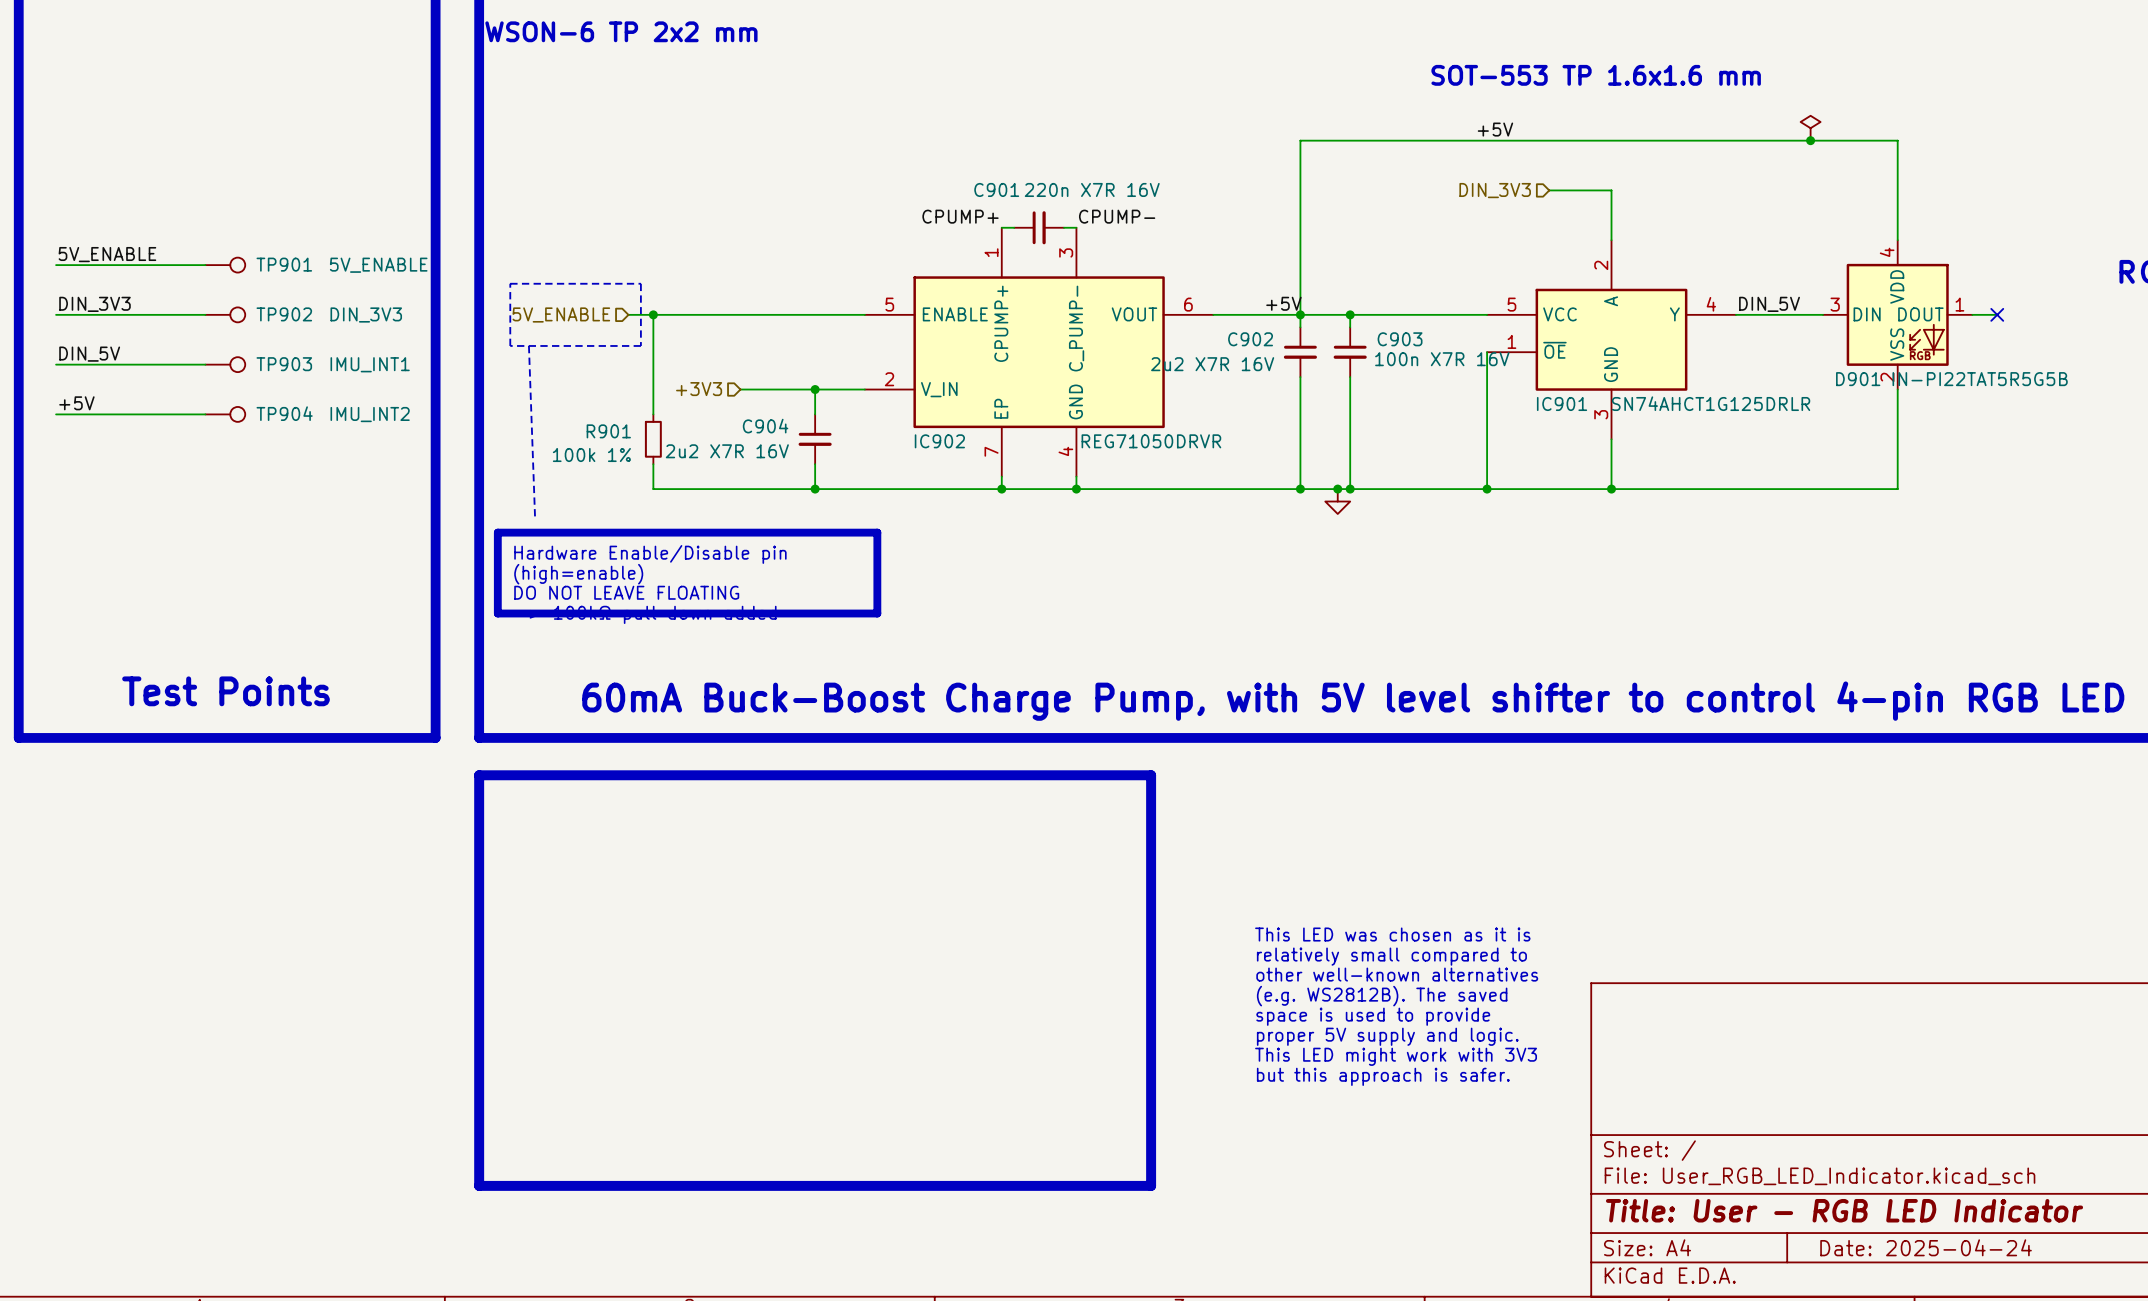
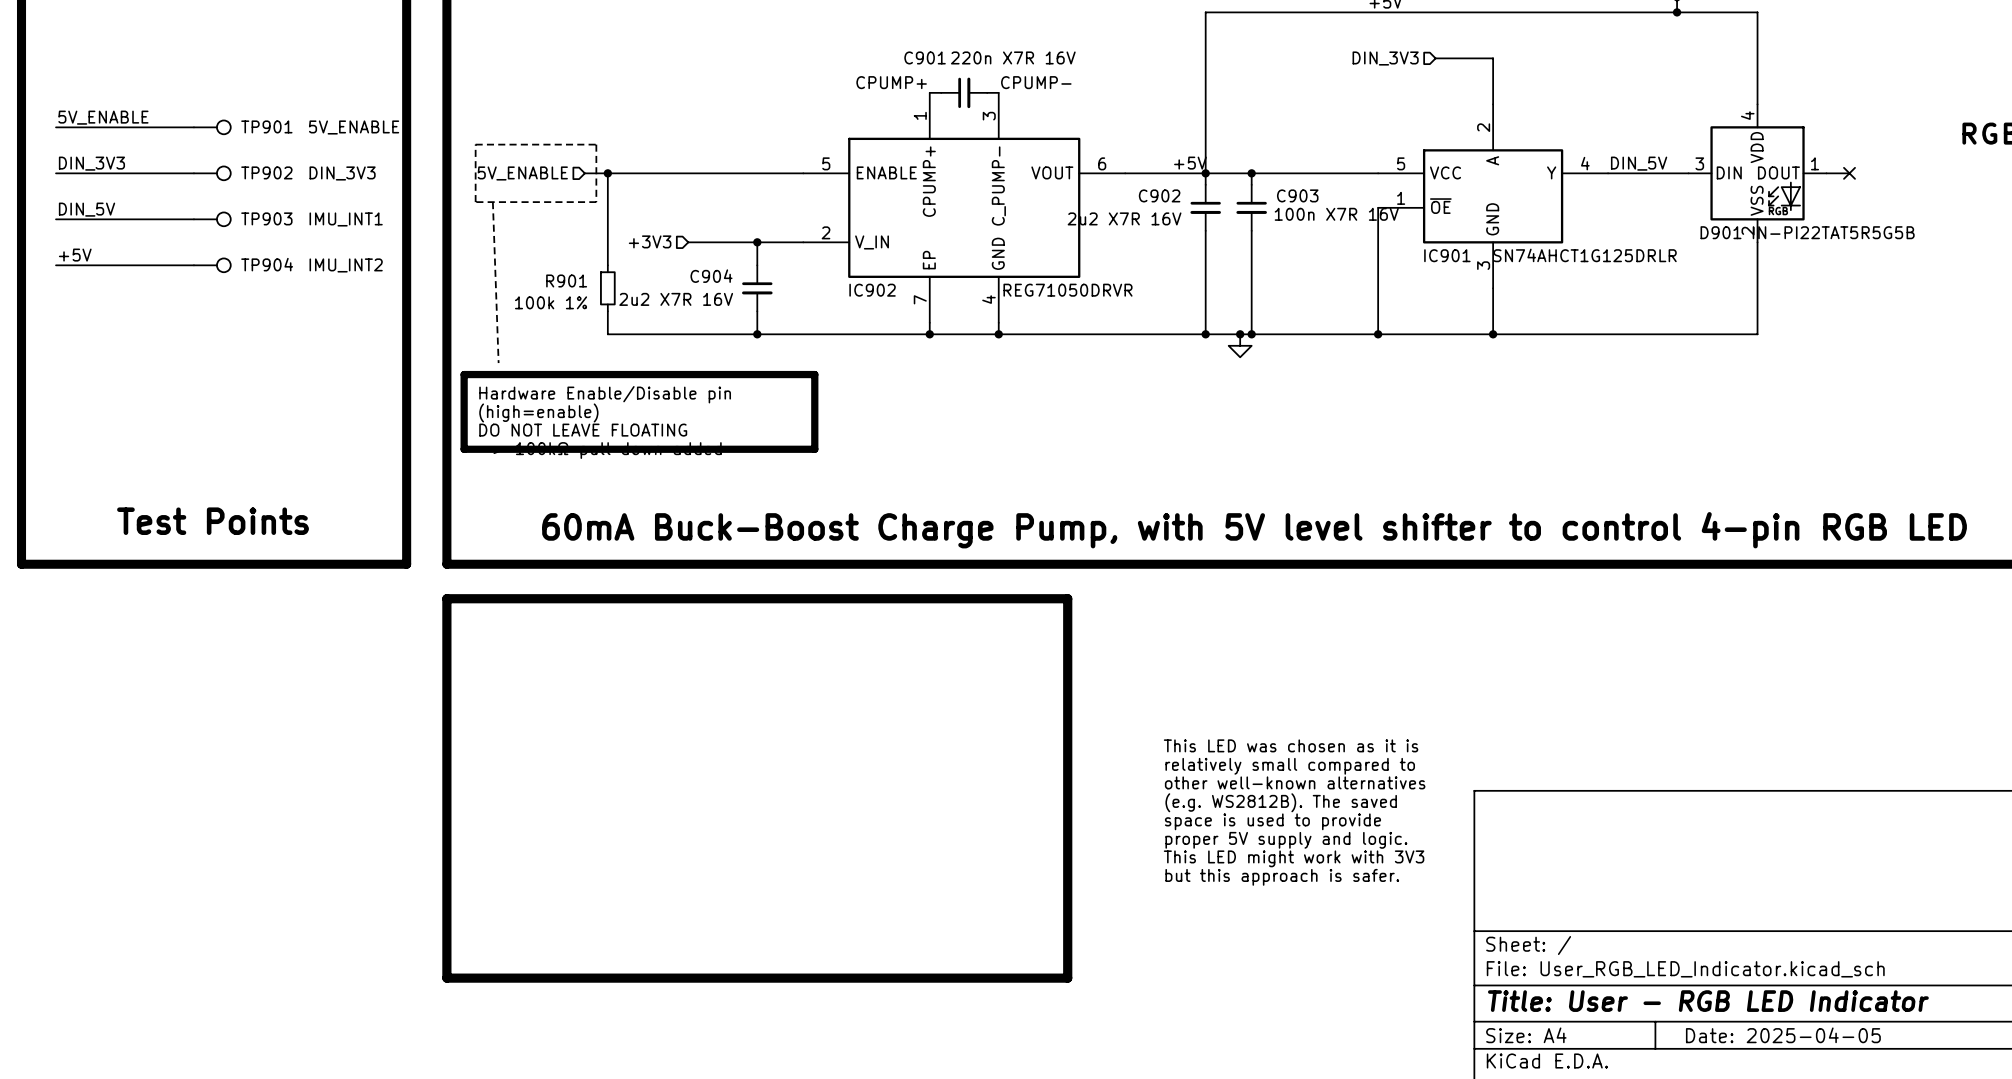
title block: Date: 2025-04-24 (1926, 1247) -> Date: 2025-04-05 (1783, 1035)

